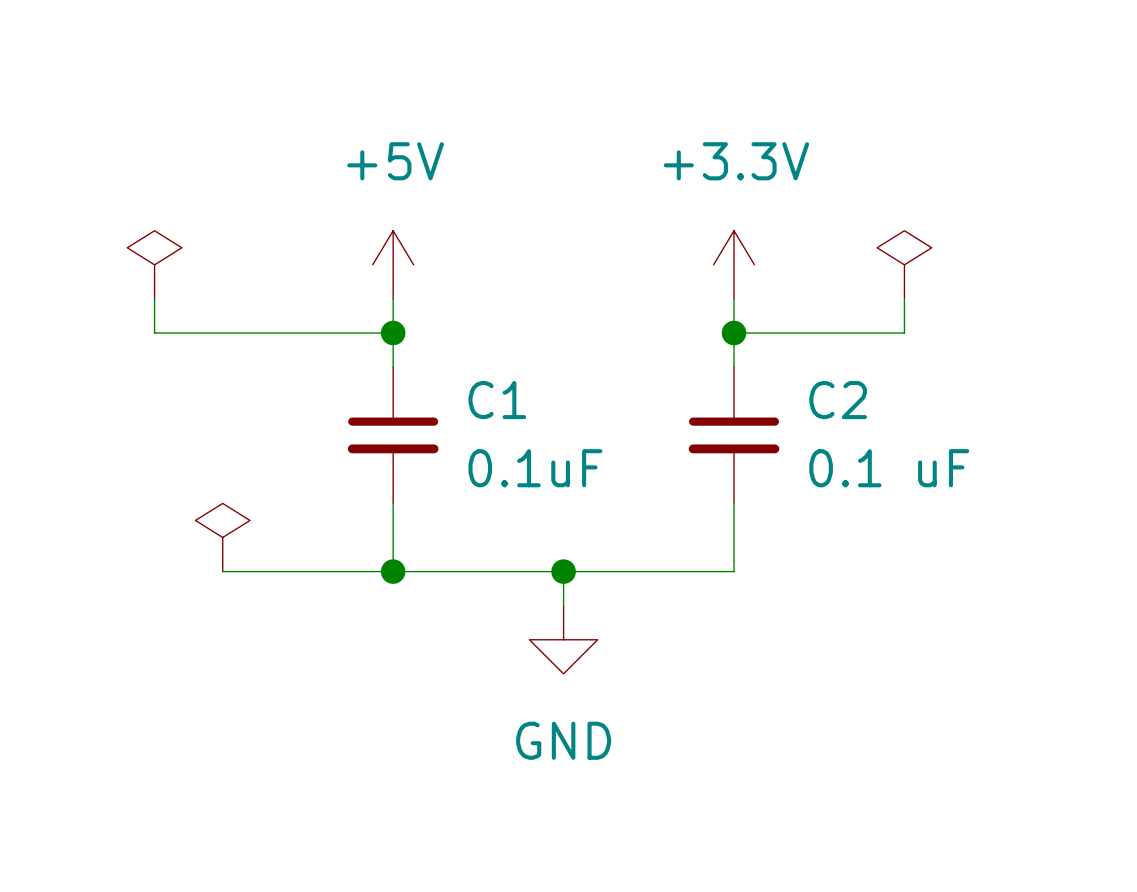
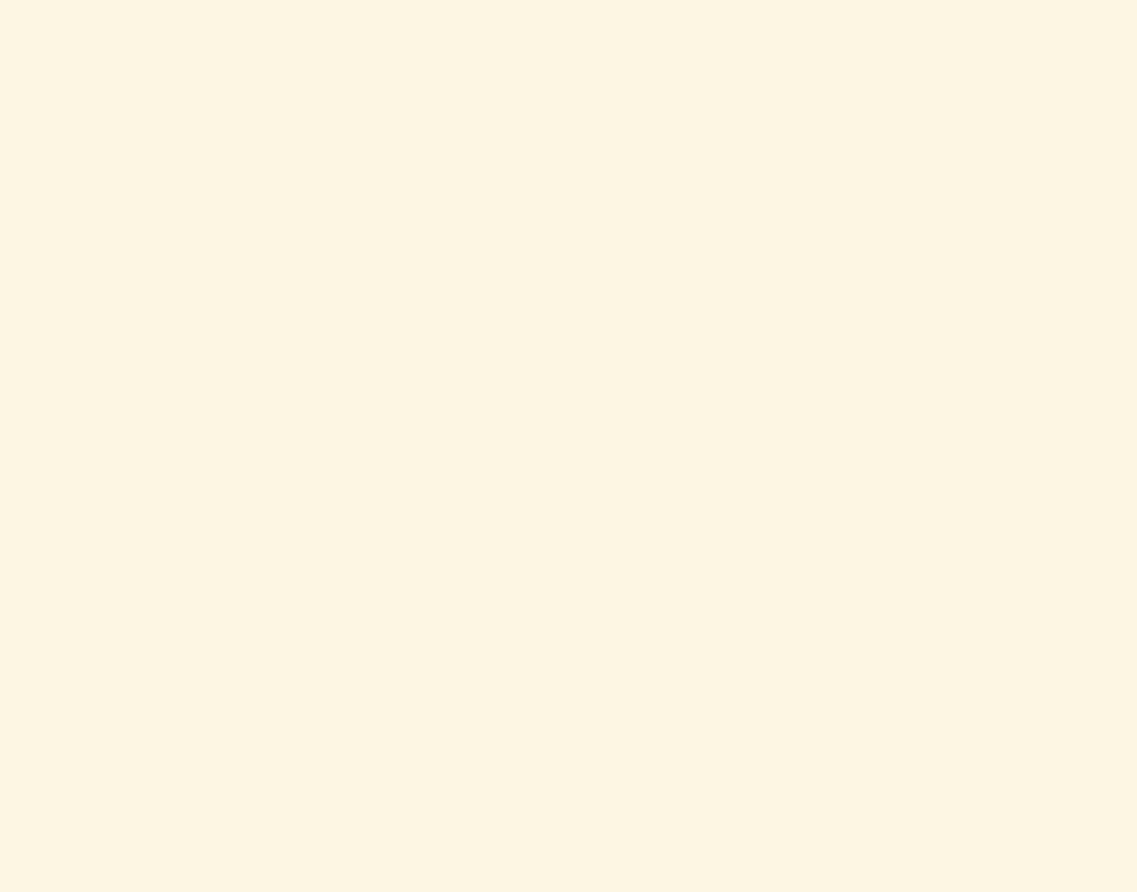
power symbol: (154, 264) -> none
power symbol: +5V (393, 264) -> none
power symbol: +3.3V (734, 264) -> none
power symbol: (904, 264) -> none
wire: (154, 298) (154, 333) (393, 333) -> none
wire: (393, 298) (393, 367) -> none
wire: (734, 298) (734, 367) -> none
wire: (904, 298) (904, 333) (734, 333) -> none
junction: (393, 333) -> none
junction: (734, 333) -> none
C1: 0.1uF (393, 435) -> none
C2: 0.1 uF (734, 435) -> none
wire: (393, 503) (393, 571) -> none
wire: (734, 503) (734, 571) (222, 571) -> none
power symbol: (222, 537) -> none
junction: (393, 571) -> none
wire: (563, 571) (563, 605) -> none
junction: (563, 571) -> none
power symbol: GND (563, 639) -> none

